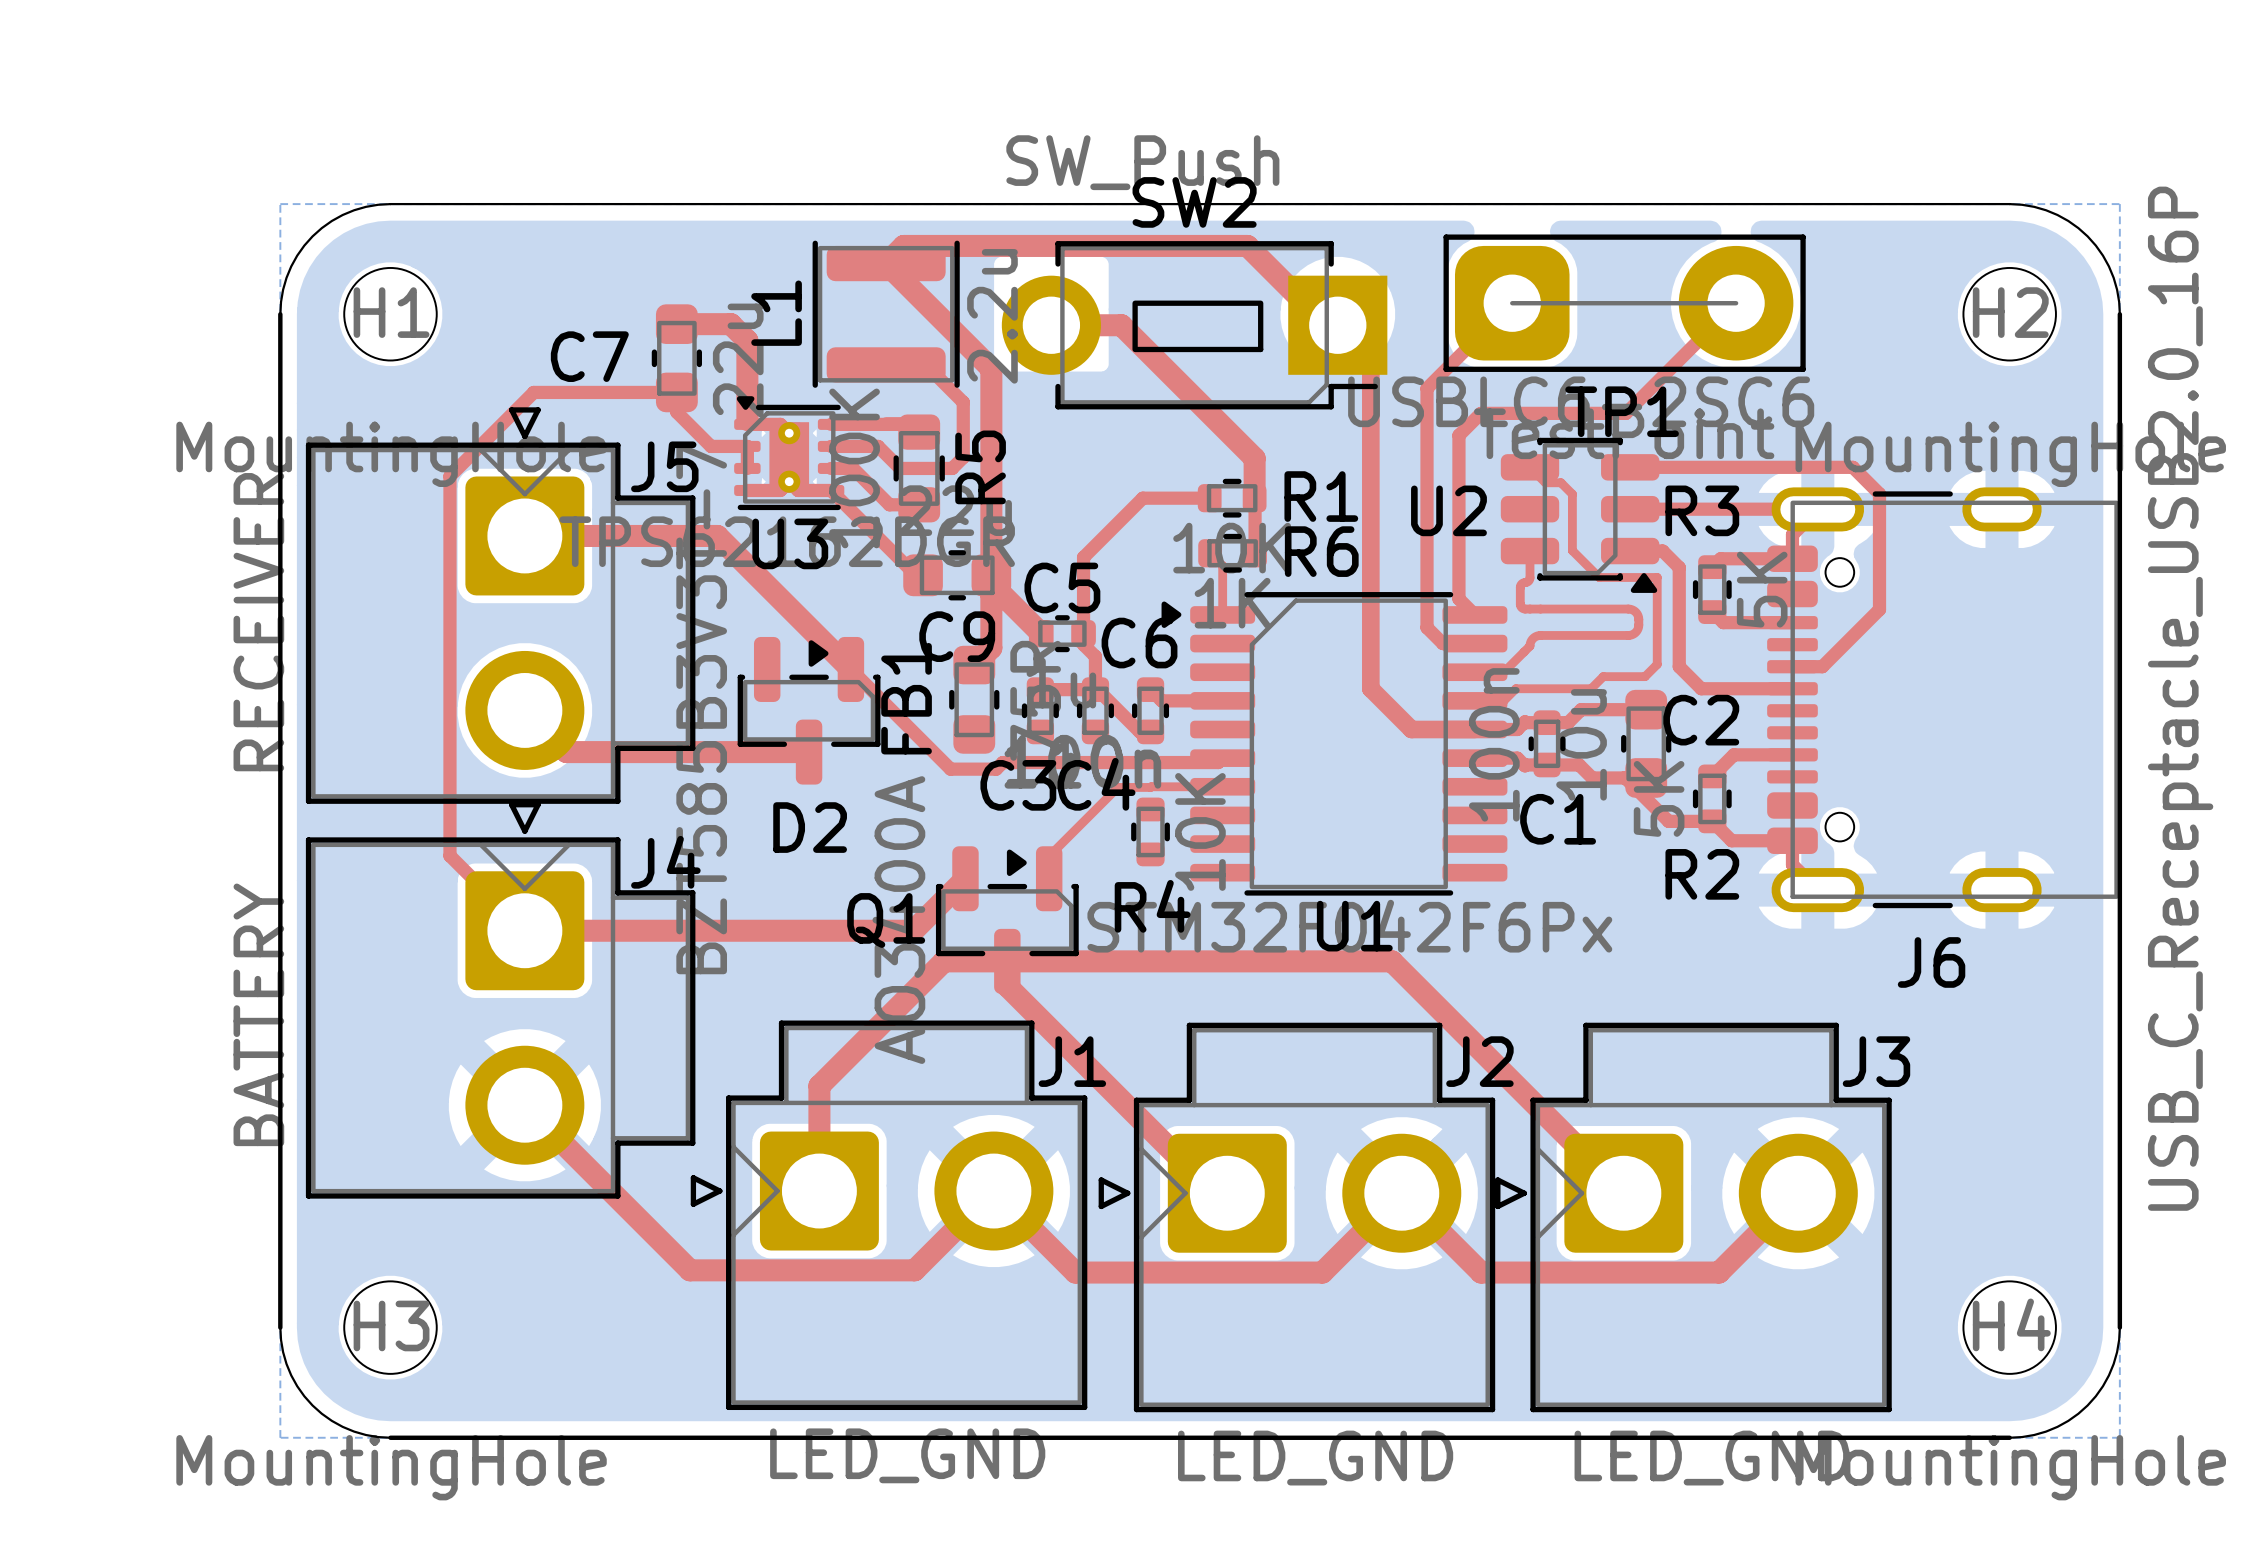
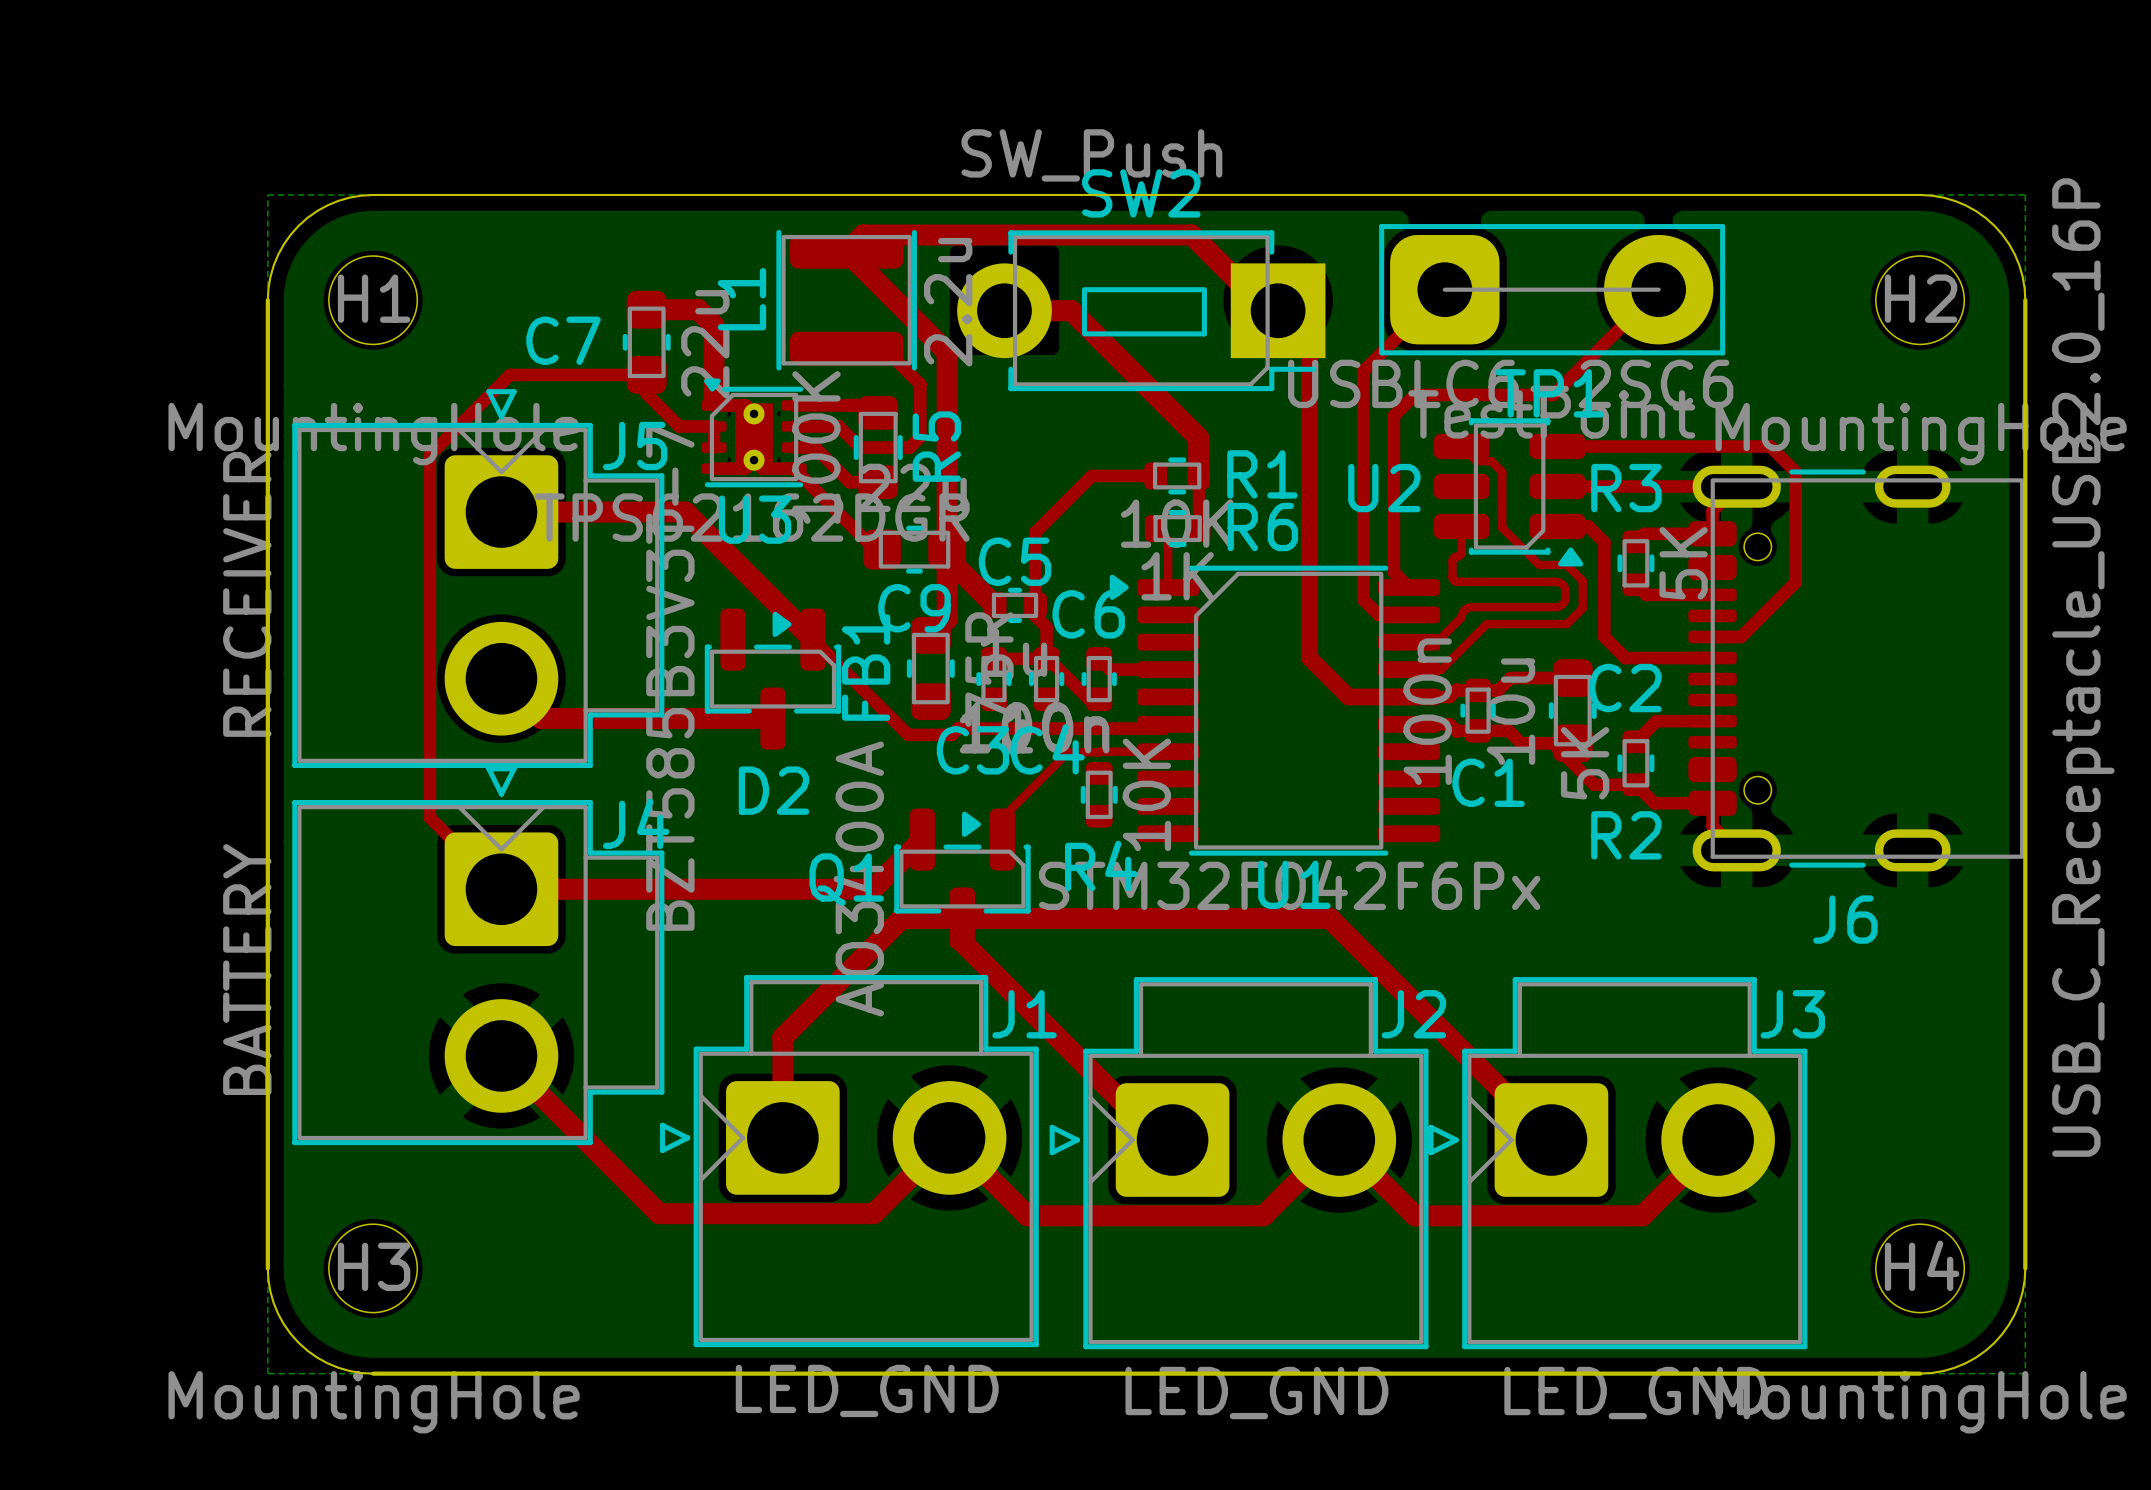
top track: (1572, 550) (1599, 577) (1657, 577) (1657, 664) (1645, 676) (1603, 676) (1591, 688) (1515, 688) (1503, 700) -> (1502, 526) (1539, 565) (1566, 565) (1582, 580) (1582, 608) (1566, 624) (1486, 624) (1441, 669) (1436, 669)

